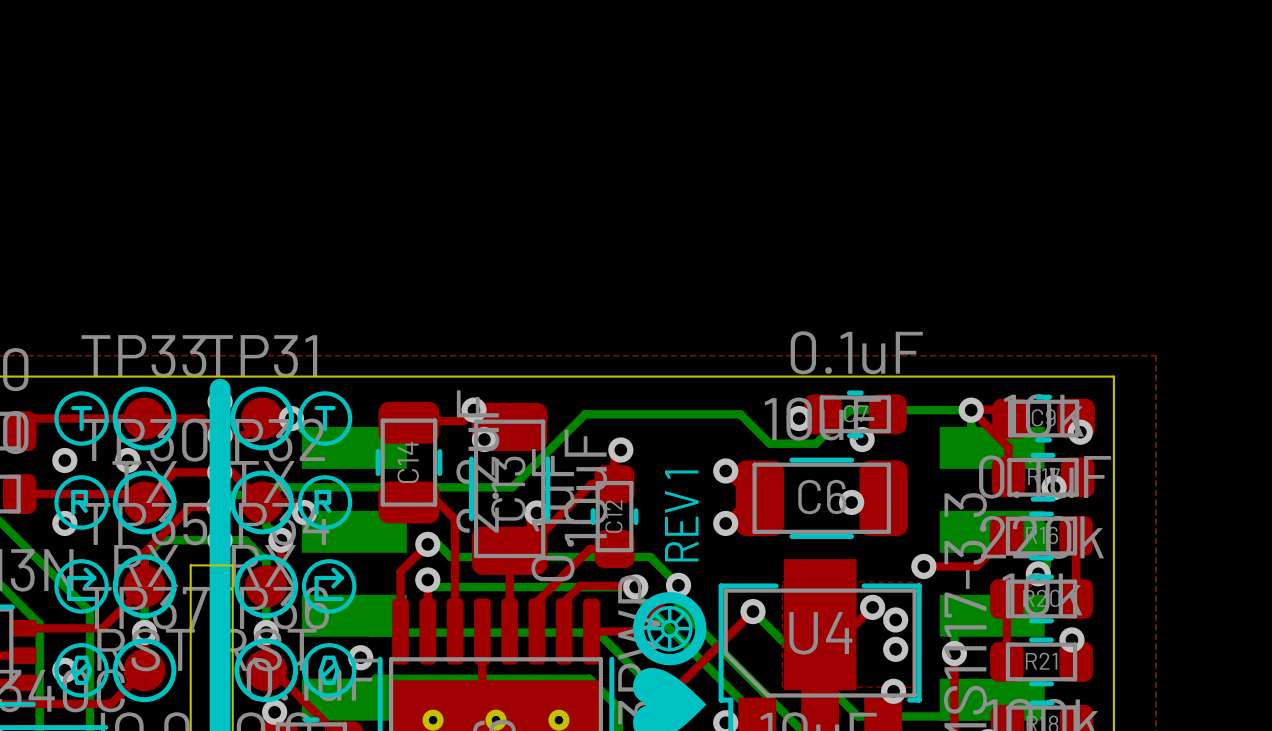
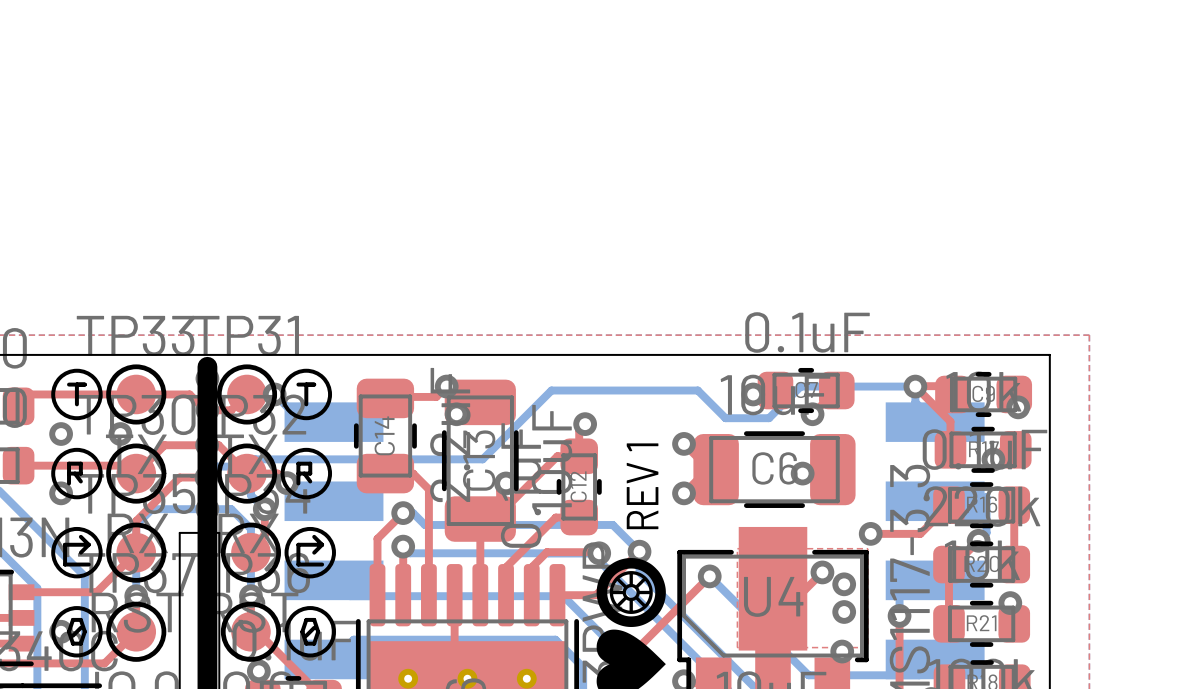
via: (360, 657) -> none

